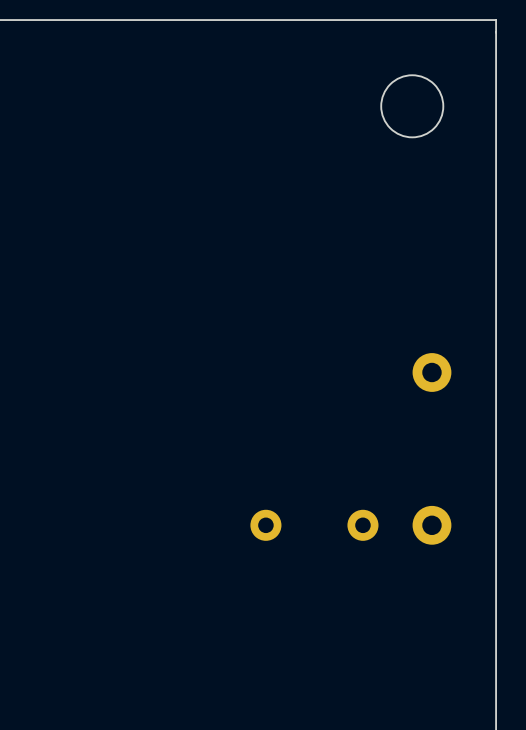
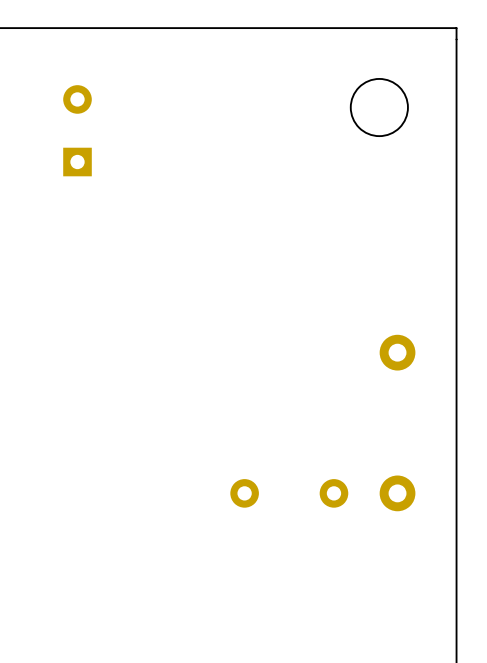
part: none -> (77, 130)

